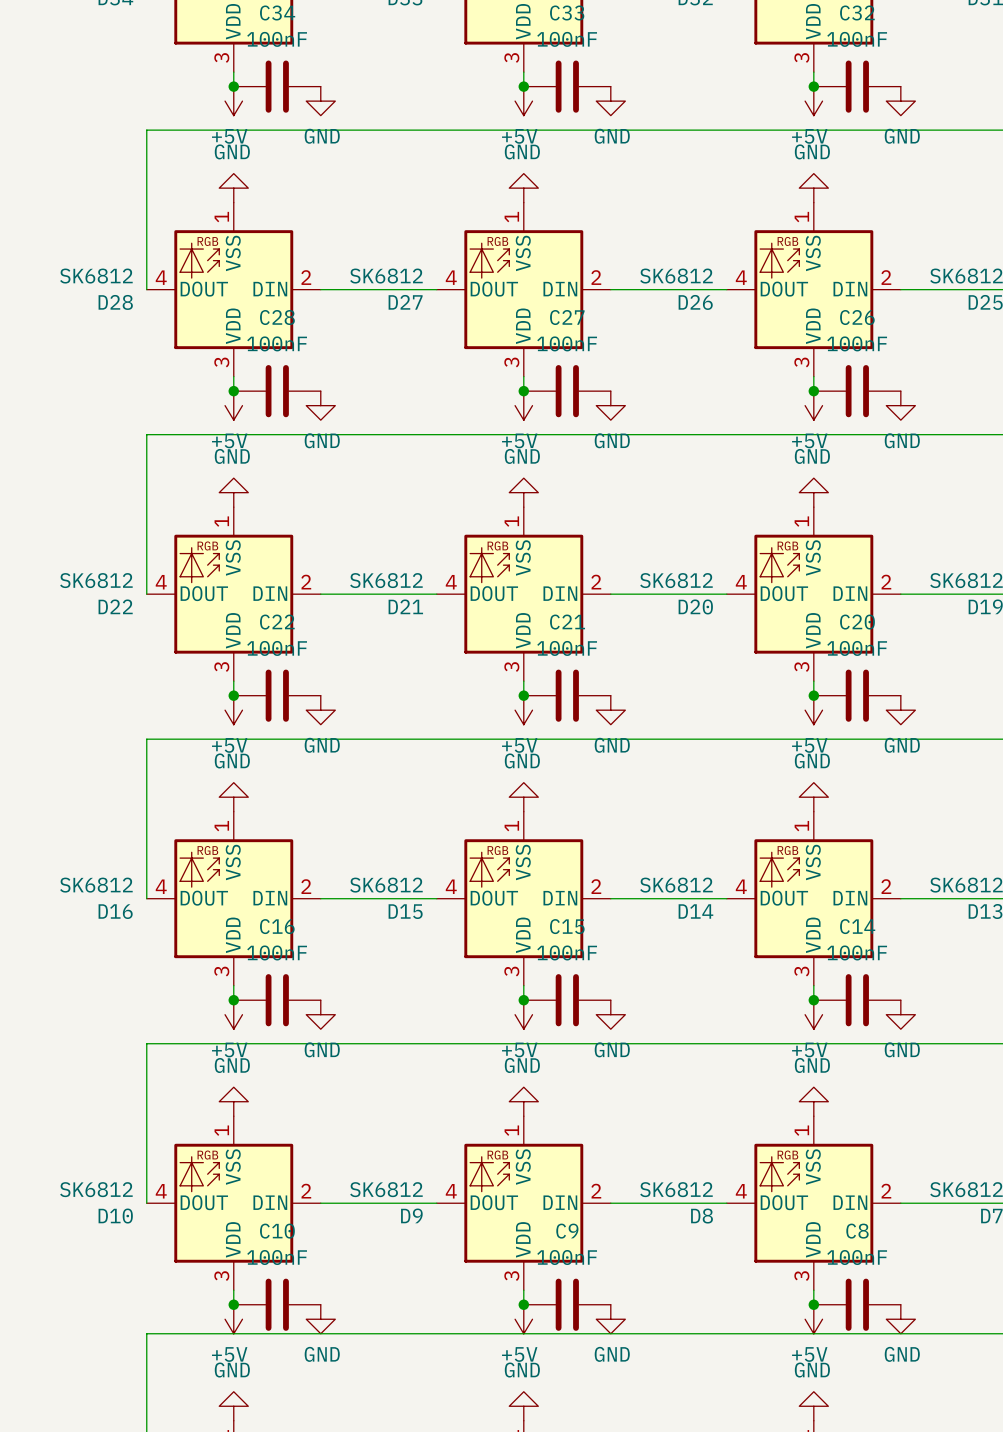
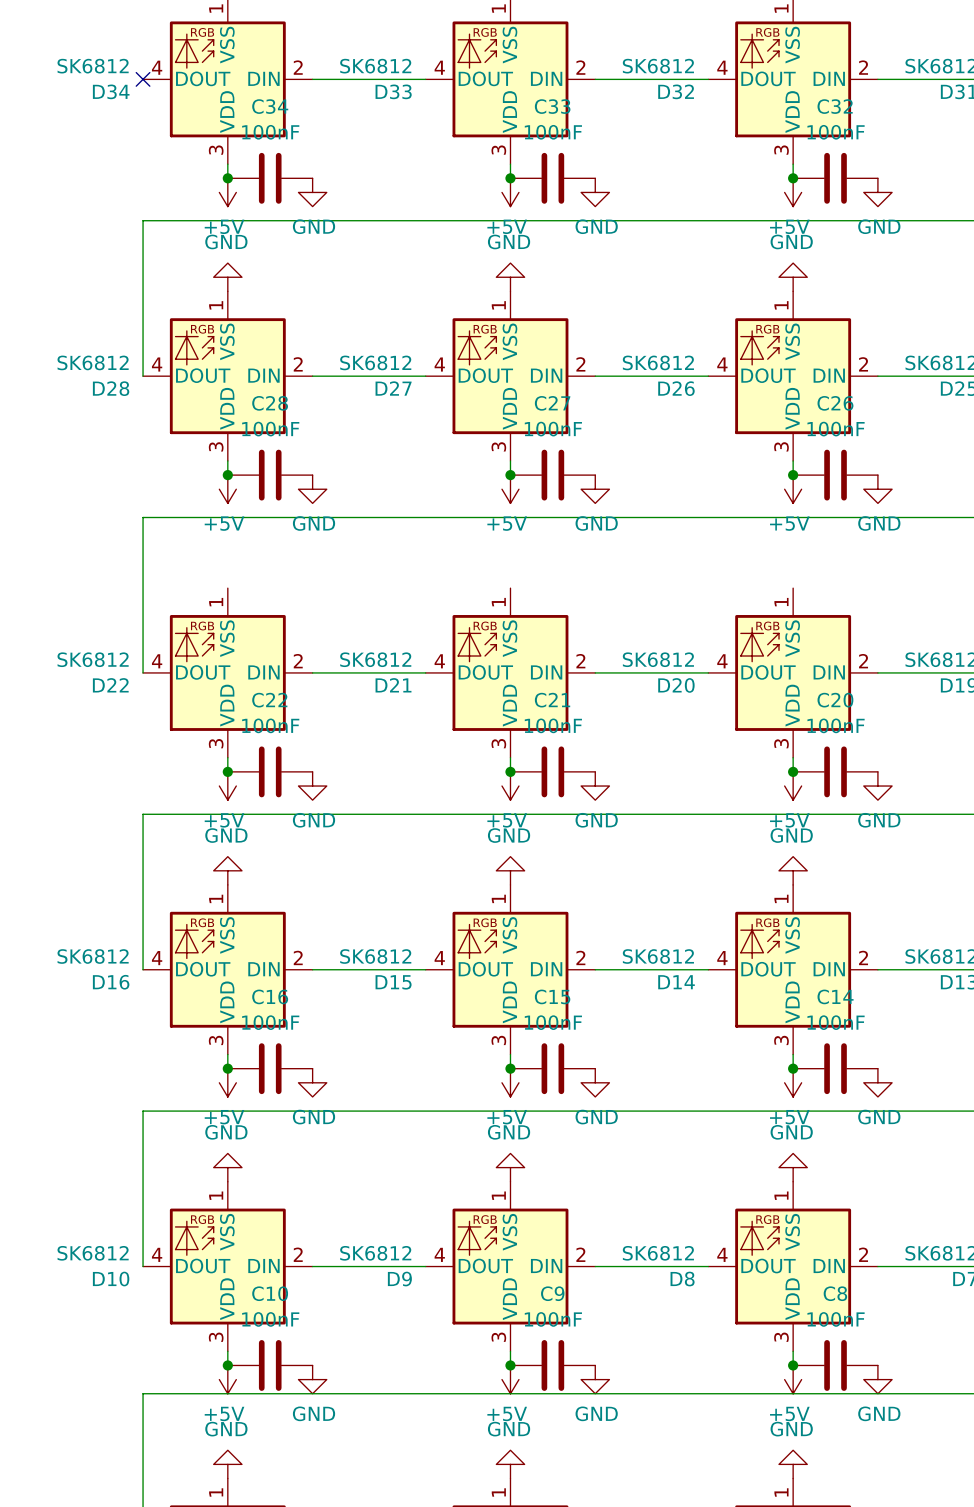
power symbol: GND (233, 492) -> none
power symbol: GND (523, 492) -> none
power symbol: GND (813, 492) -> none

